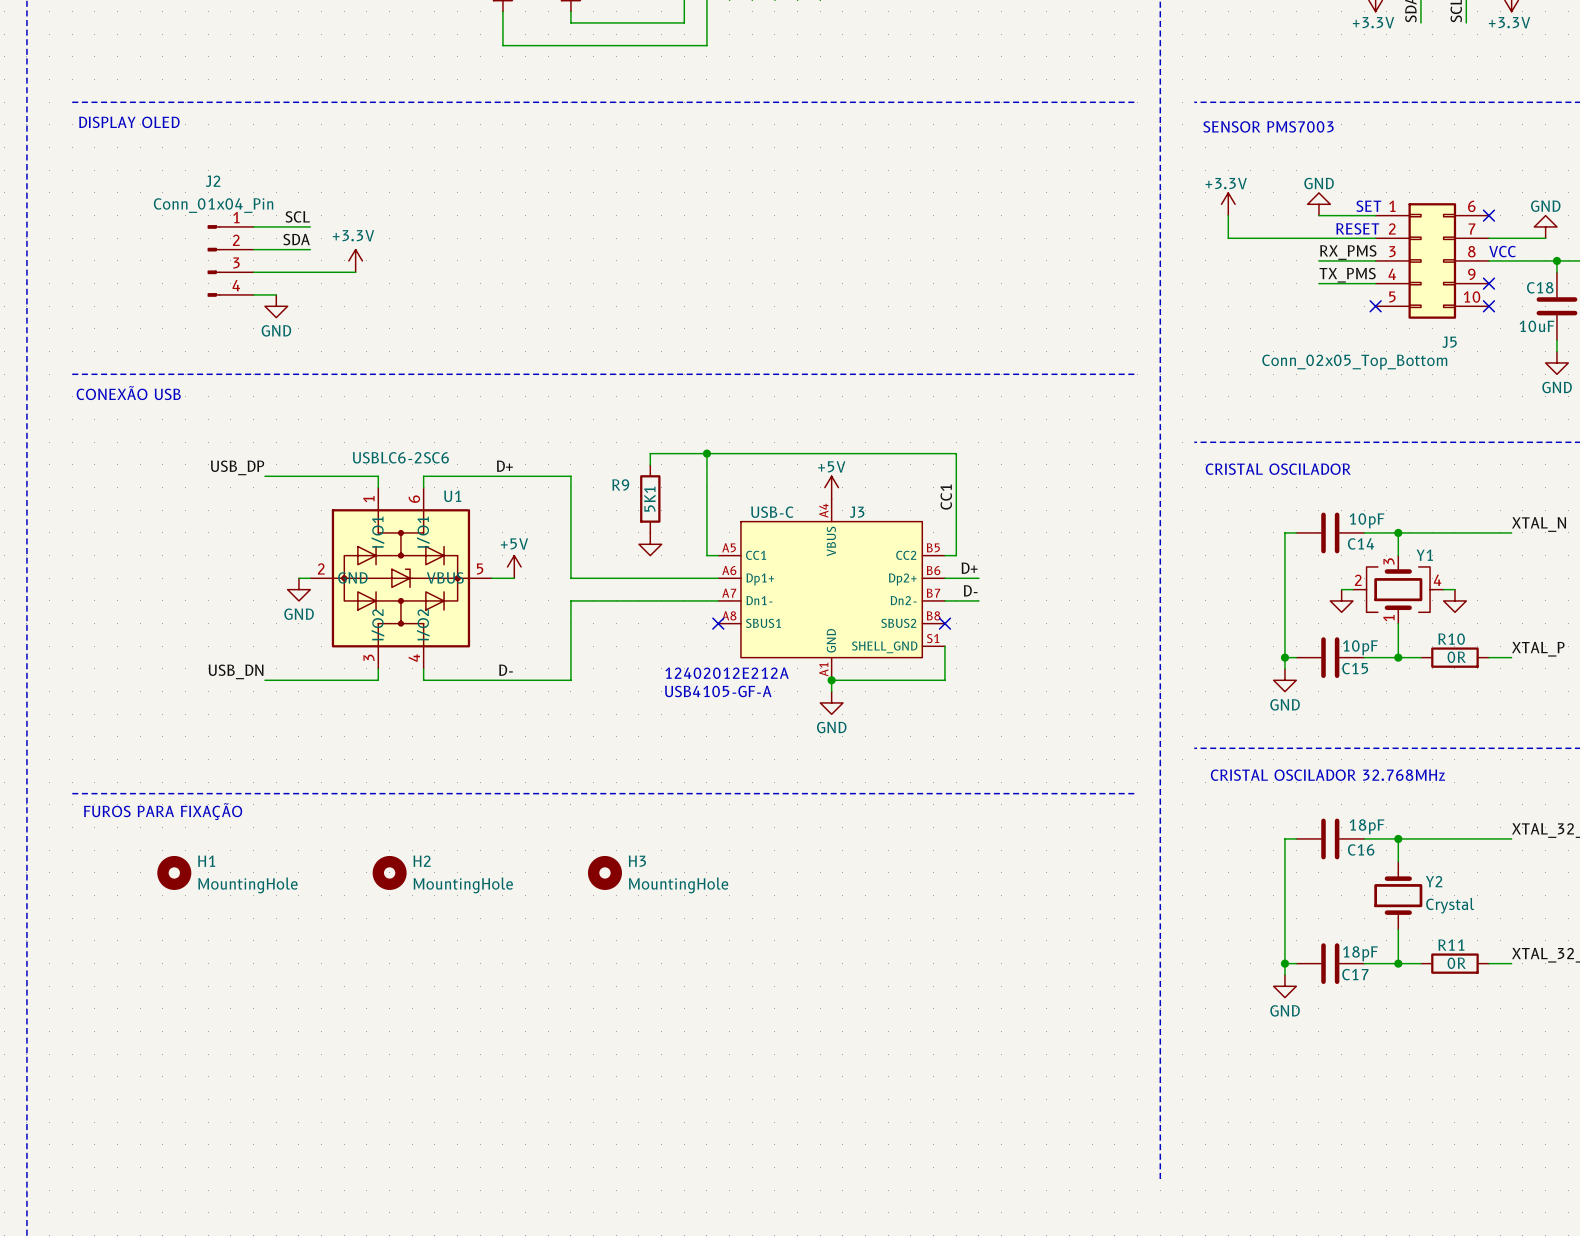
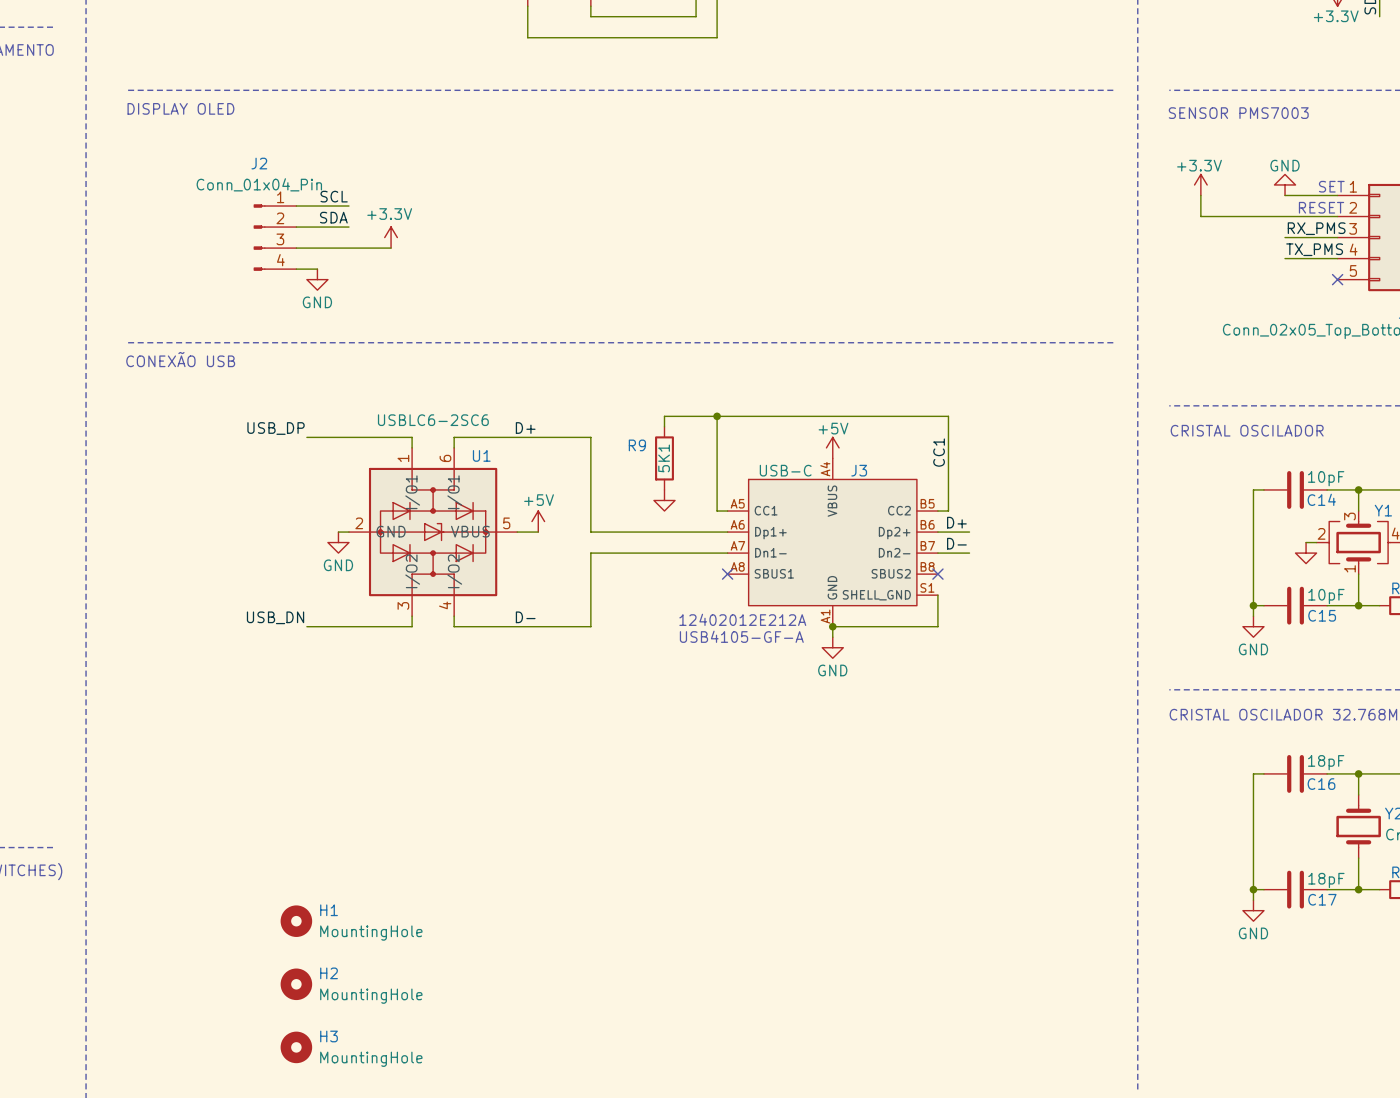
line: (72, 793) (1137, 793) -> none
text: FUROS PARA FIXAÇÃO (163, 811) -> none
H1 position: (174, 872) -> (296, 921)
H2 position: (389, 872) -> (296, 984)
H3 position: (604, 872) -> (296, 1047)

